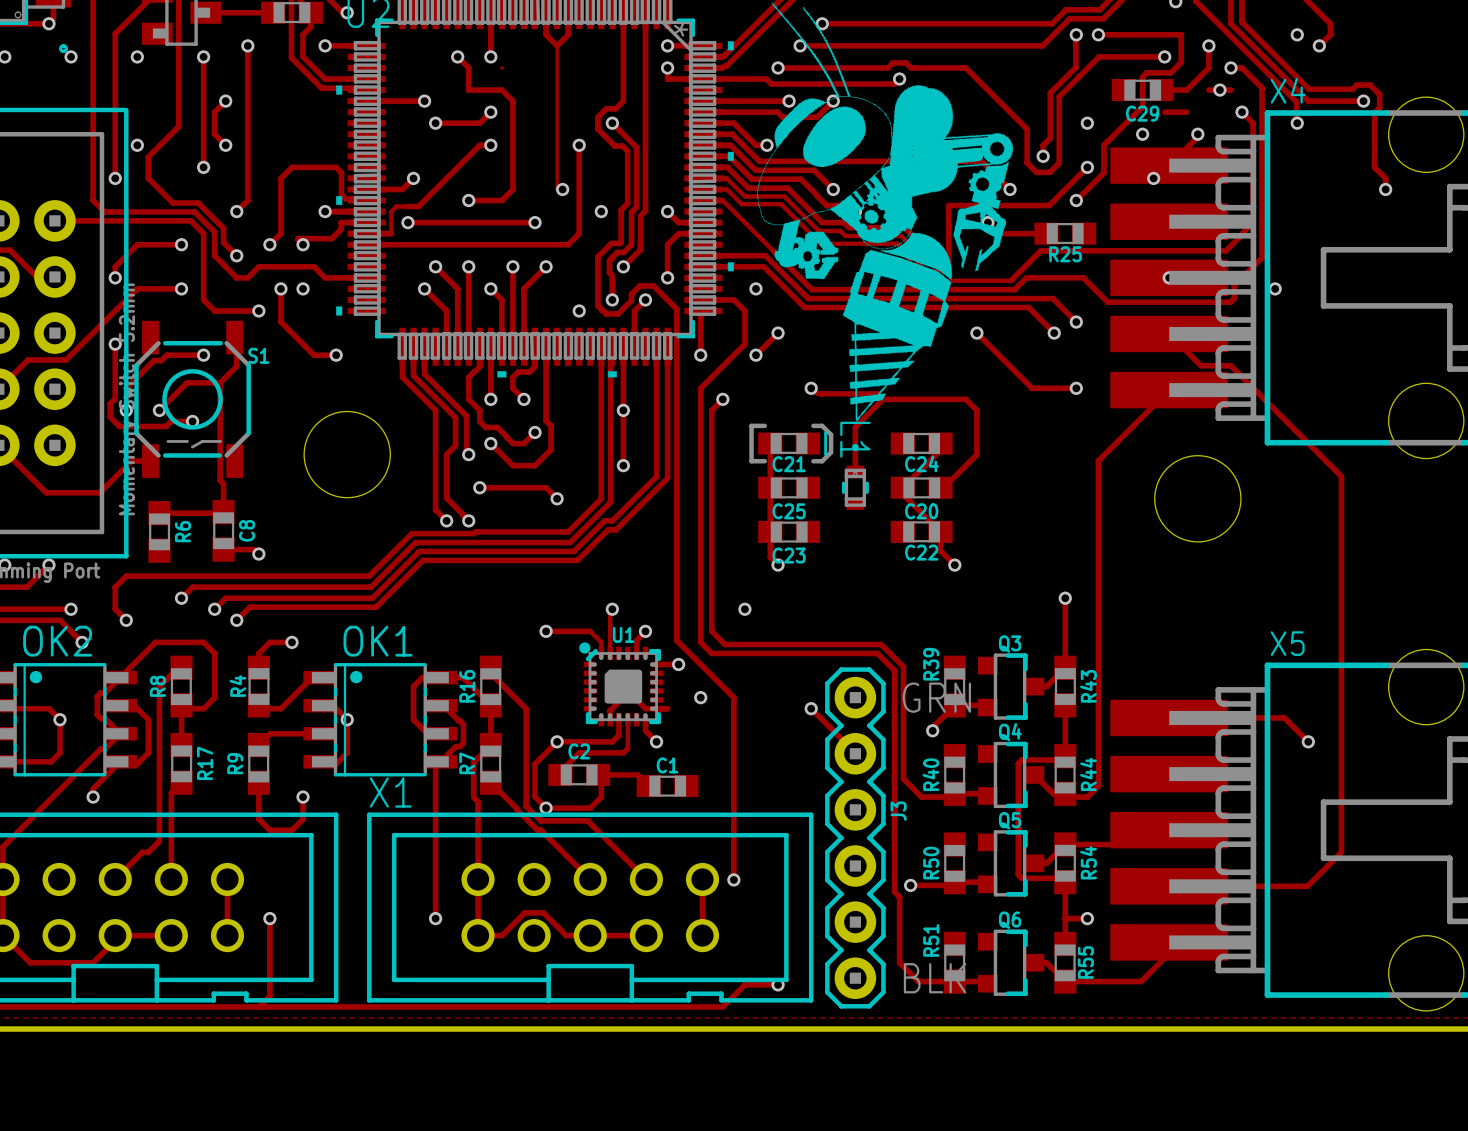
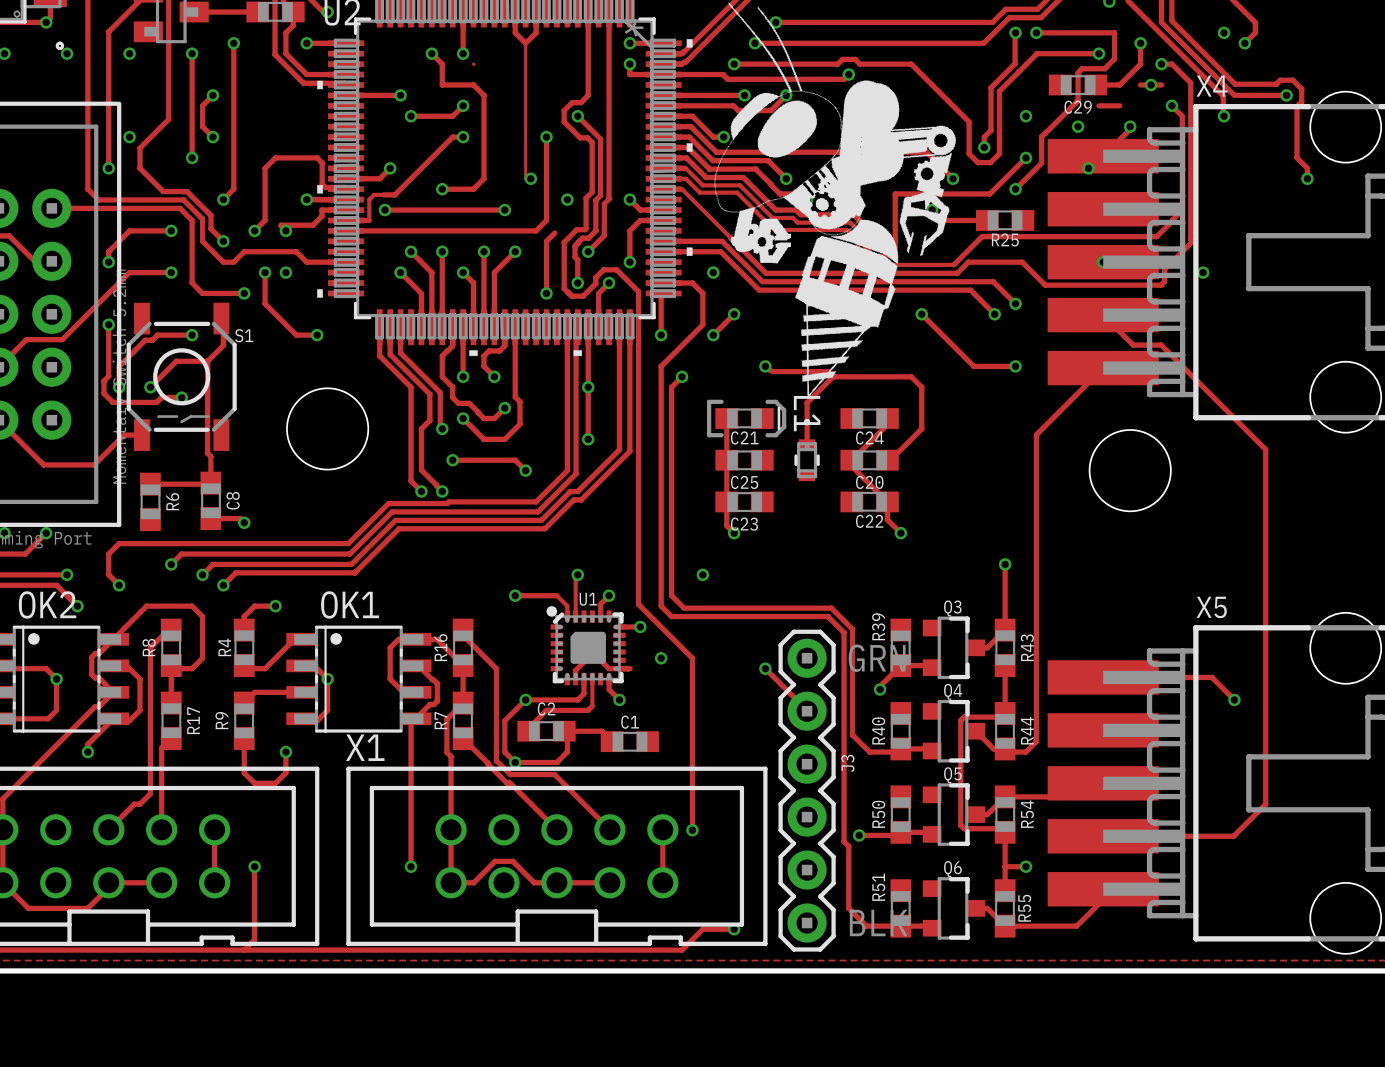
track: none -> (554, 233) (546, 241) (546, 293)

